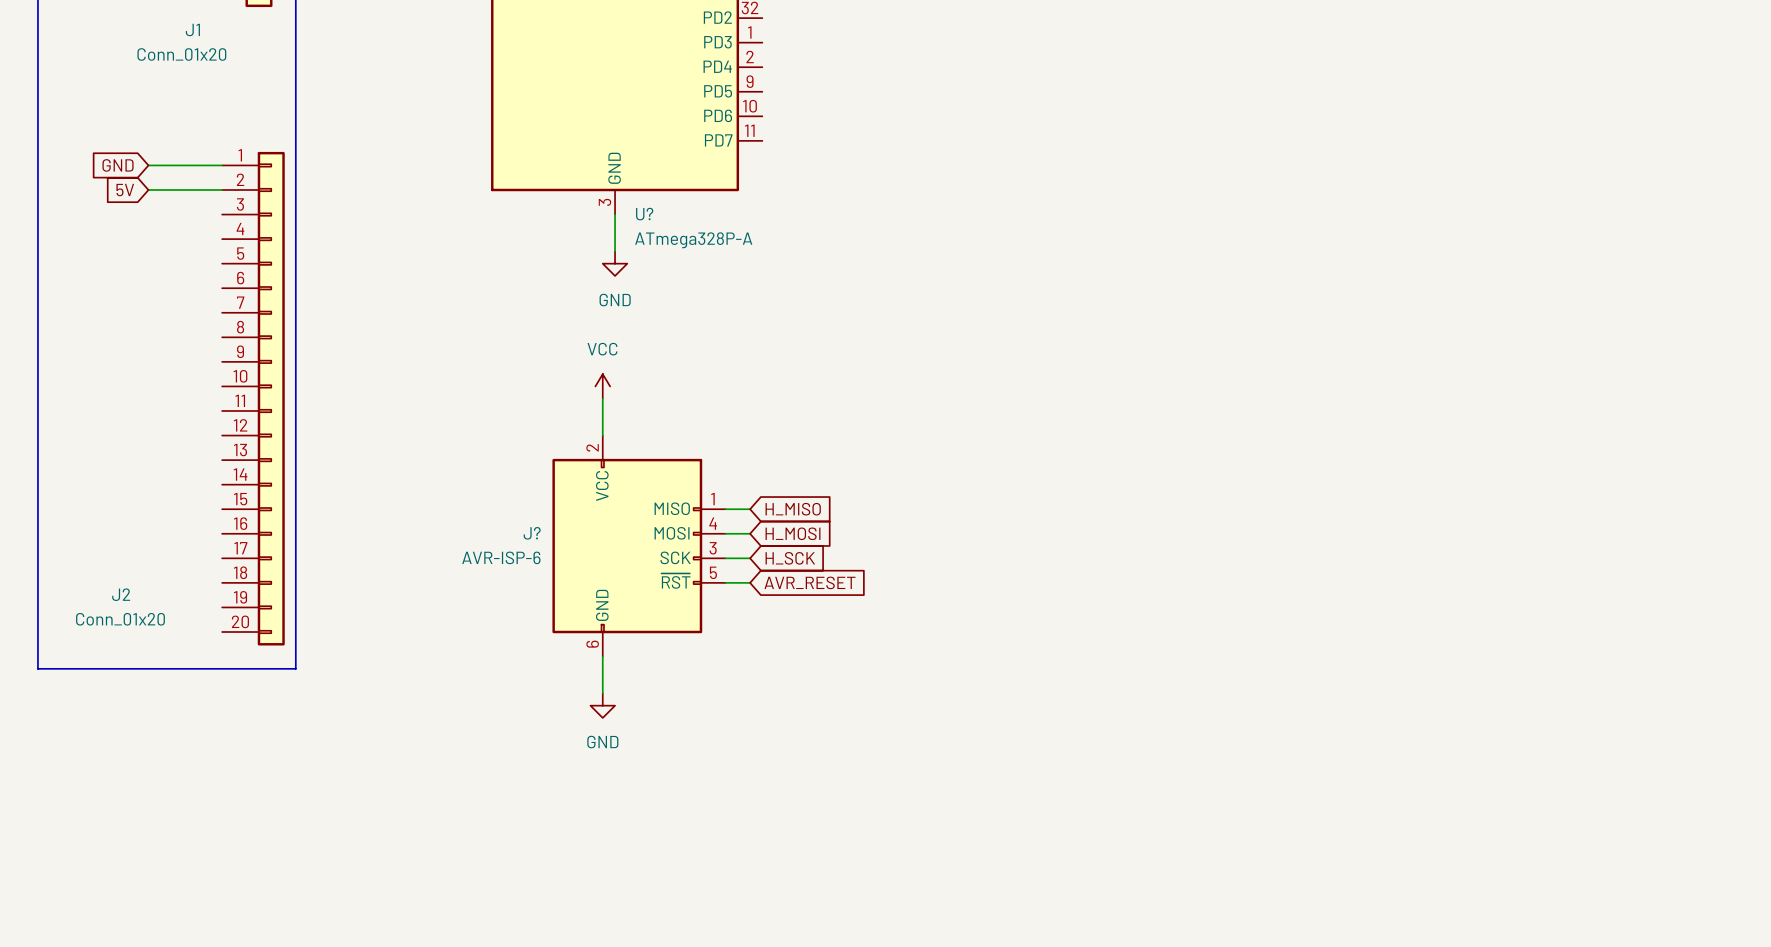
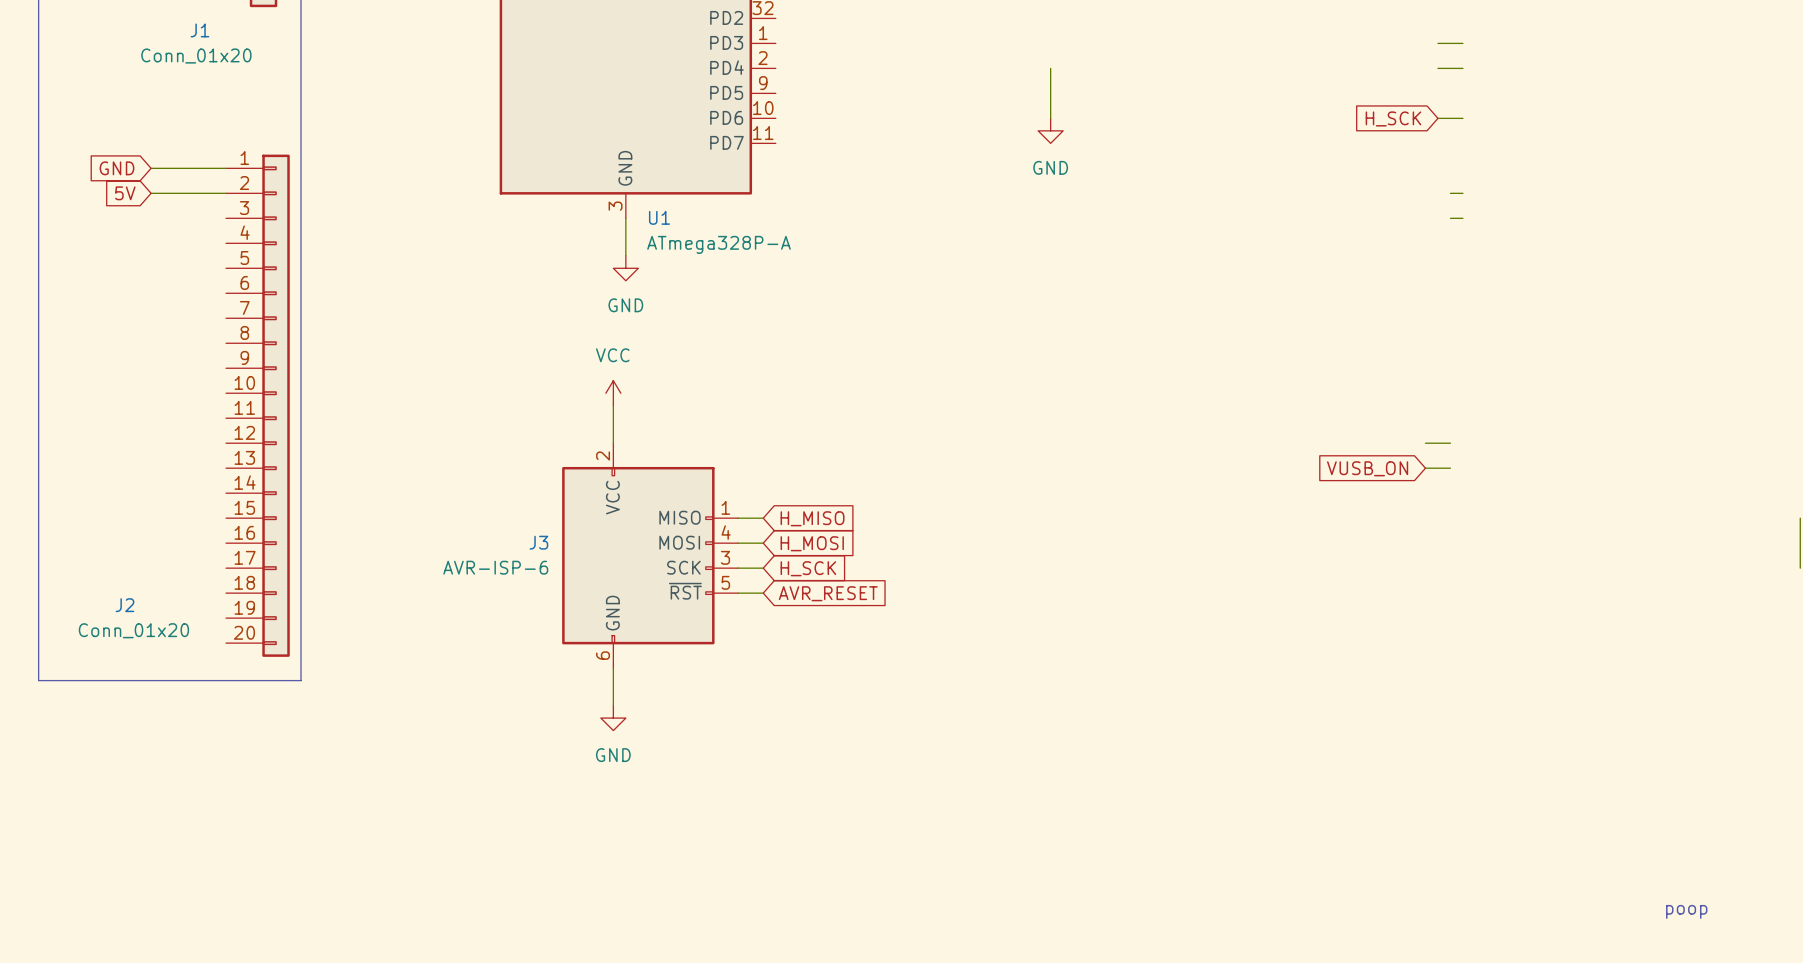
wire: none -> (1437, 43) (1462, 43)
wire: none -> (1050, 68) (1050, 118)
wire: none -> (1437, 68) (1462, 68)
global label: none -> H_SCK (1393, 118)
wire: none -> (1437, 118) (1462, 118)
power symbol: none -> GND (1050, 130)
wire: none -> (1450, 193) (1462, 193)
U? name: U? (644, 214) -> U1 (659, 217)
wire: none -> (1450, 218) (1462, 218)
wire: none -> (1425, 443) (1450, 443)
global label: none -> VUSB_ON (1367, 468)
wire: none -> (1425, 468) (1450, 468)
wire: none -> (1800, 518) (1800, 568)
J? name: J? (532, 533) -> J3 (538, 542)
text: none -> poop (1686, 911)

